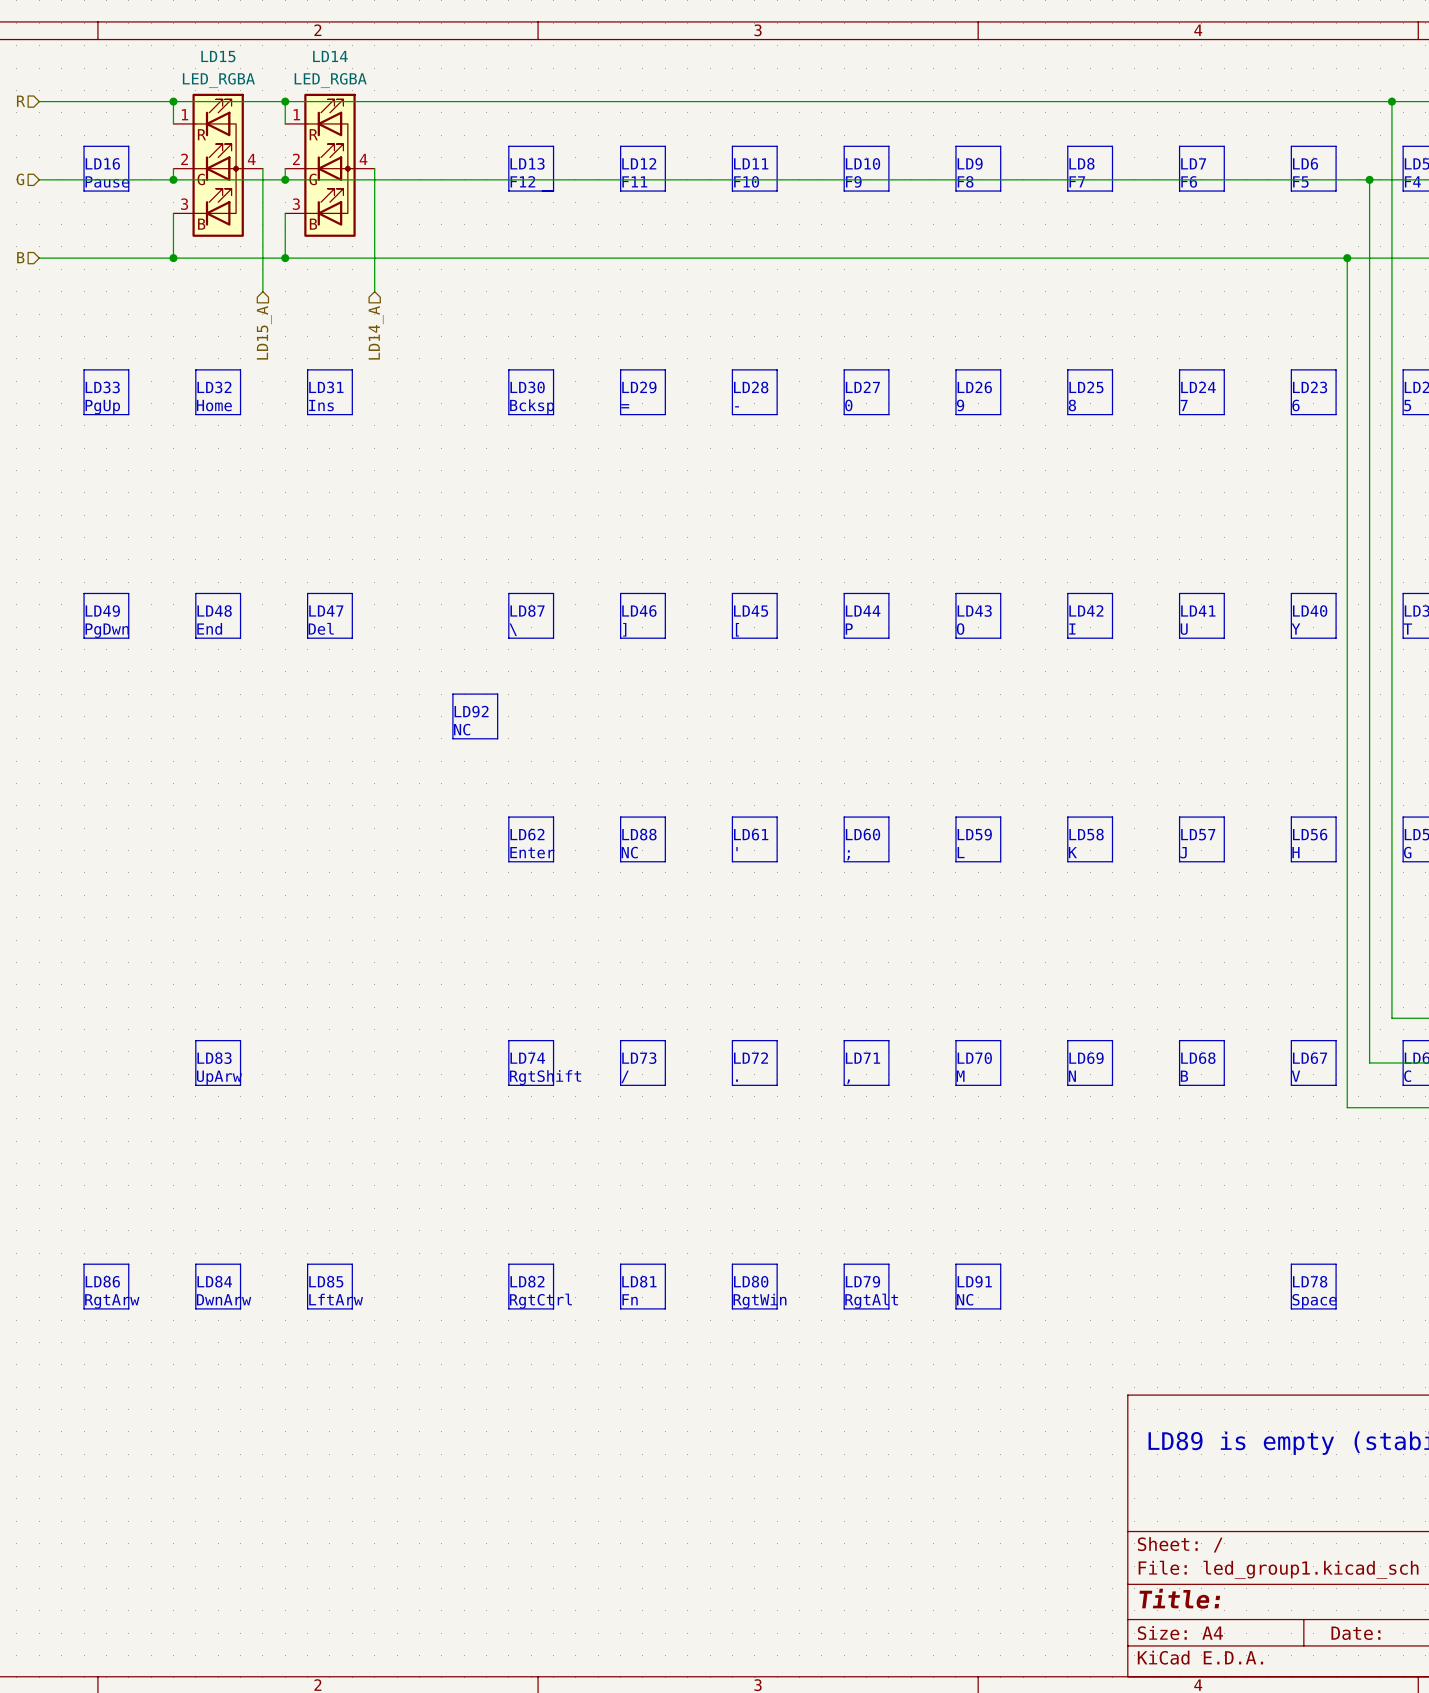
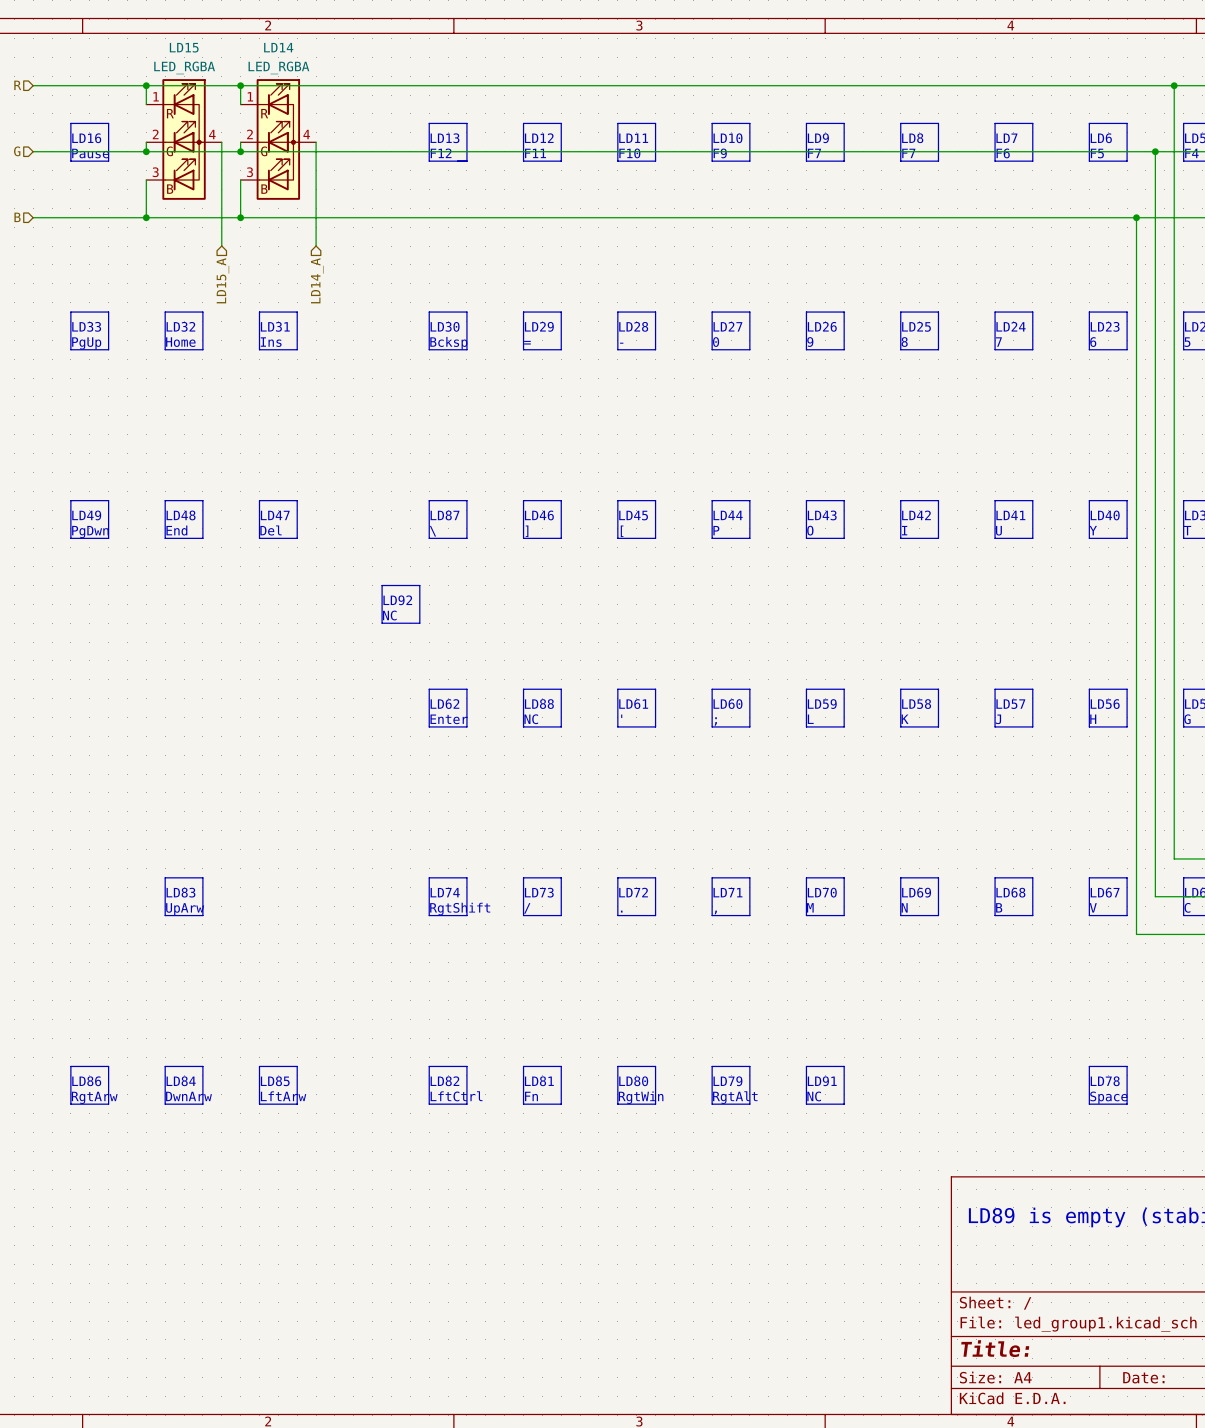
text: F8 (965, 181) -> F7 (814, 153)
text: RgtCtrl (540, 1301) -> LftCtrl (456, 1096)

